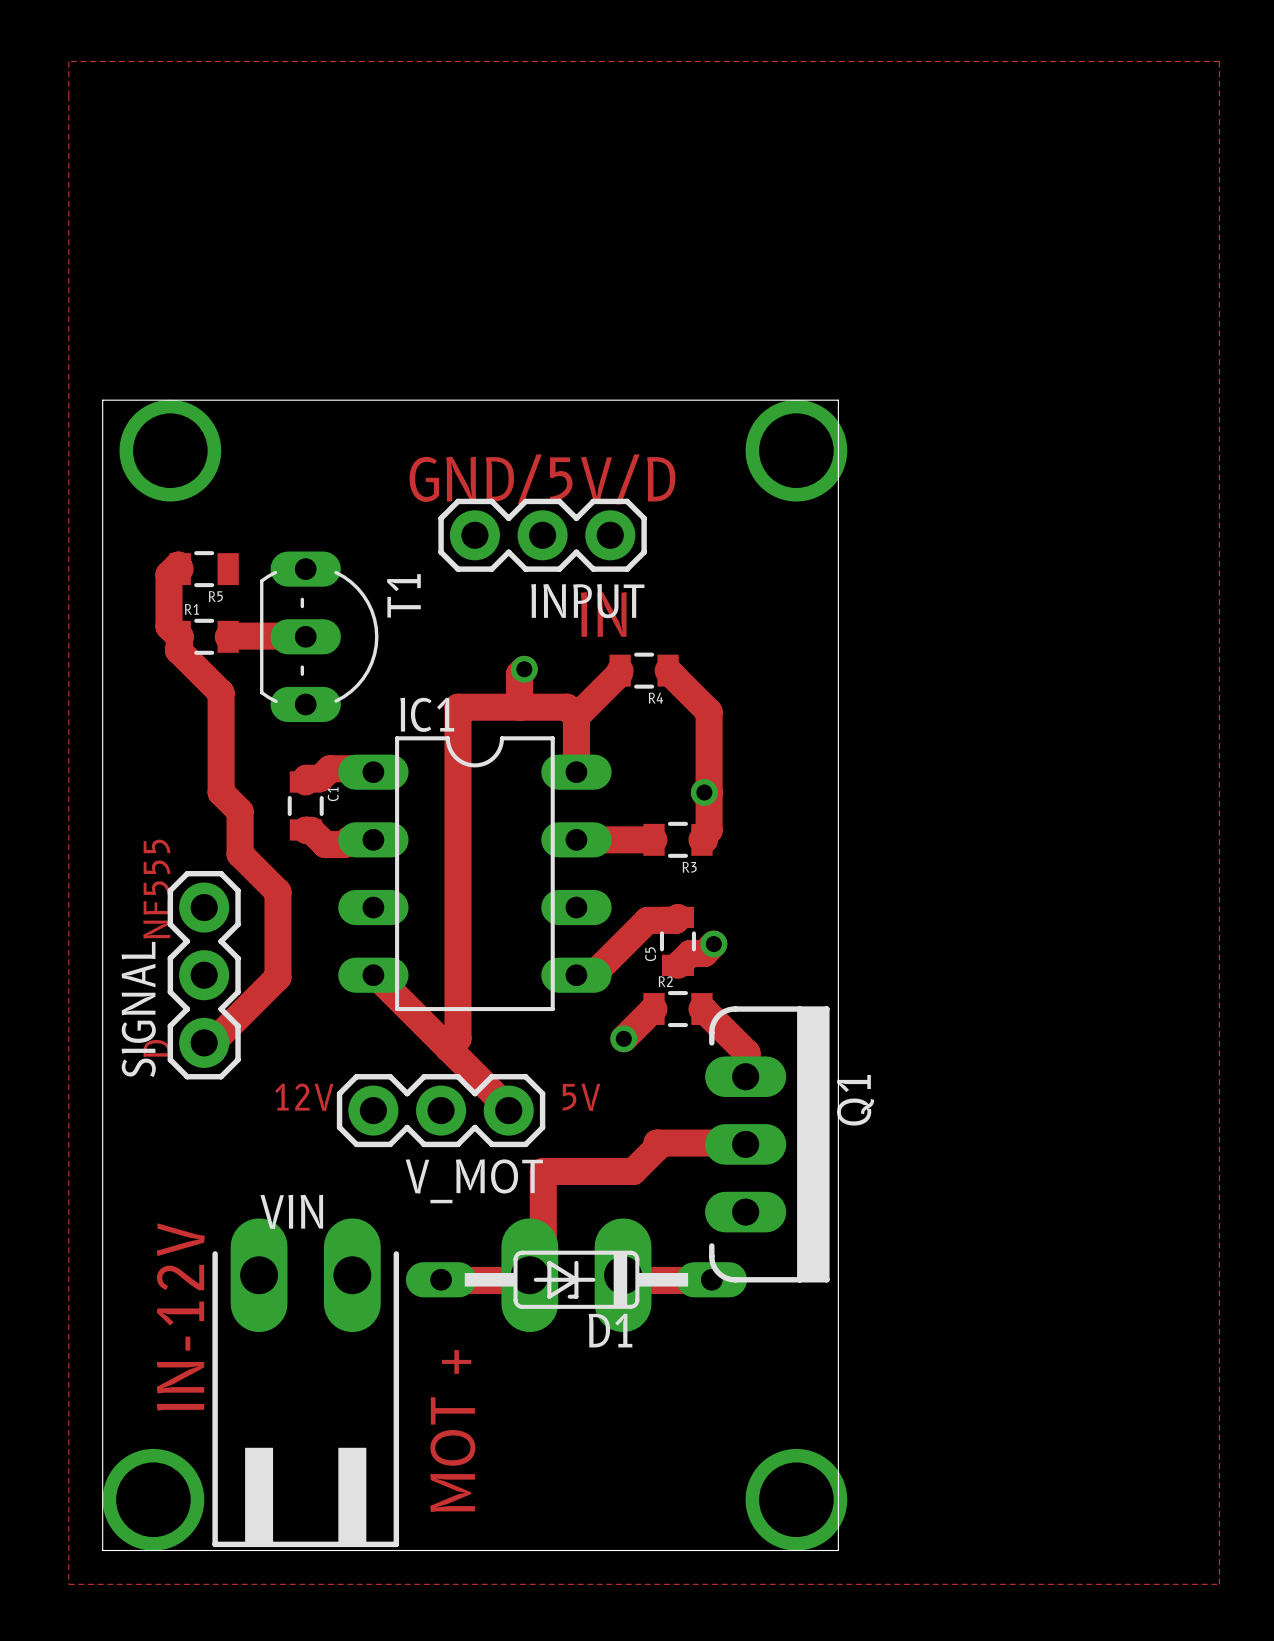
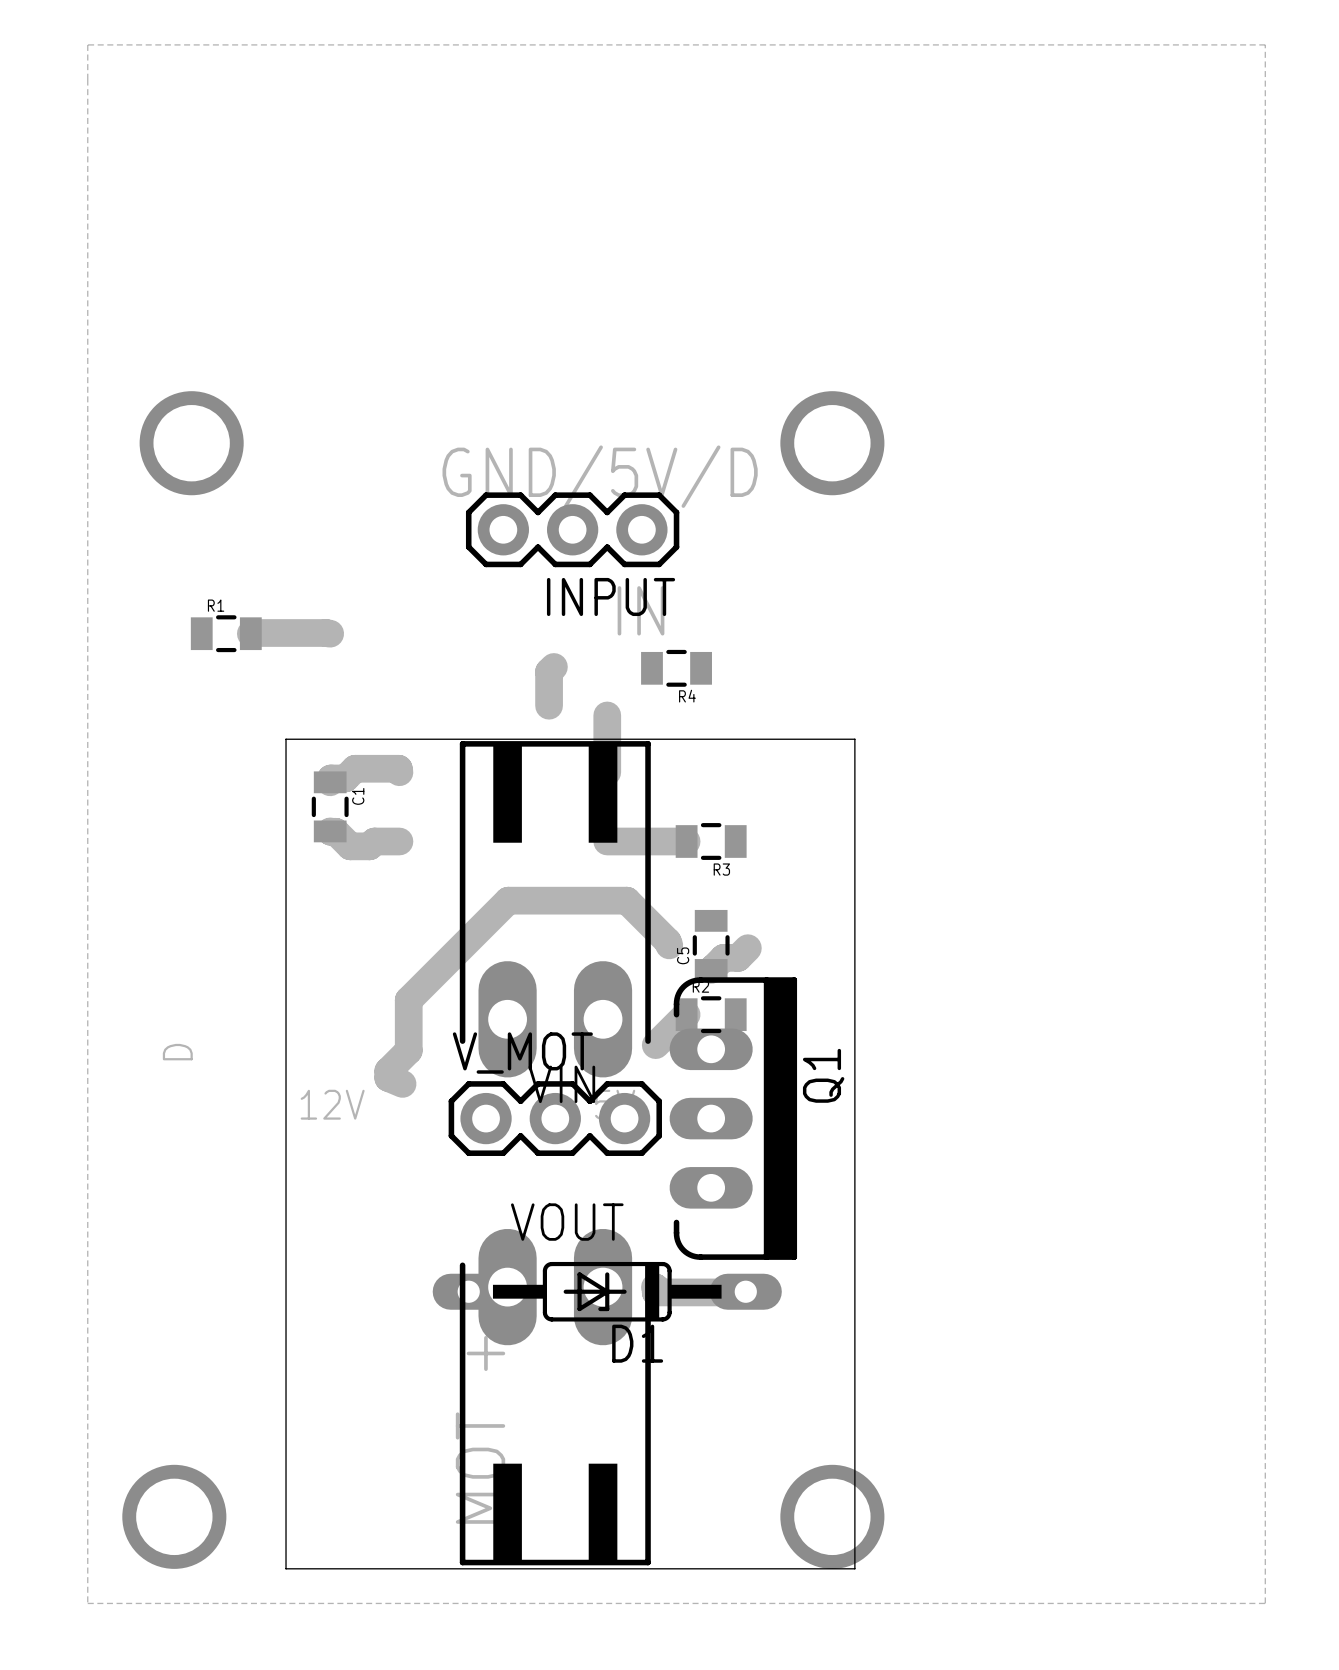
track: (180, 569) (178, 565) (169, 574) (169, 626) (180, 636) (178, 650) (221, 692) (221, 792) (240, 811) (240, 854) (277, 891) (277, 977) (216, 1038) (206, 1038) (204, 1042) -> none
R5: (204, 569) -> none
T1: (319, 636) -> none
via: (524, 669) -> none
track: (620, 670) (619, 674) (576, 716) (566, 707) (458, 707) (458, 1038) (448, 1048) -> none
track: (668, 670) (709, 711) (709, 830) (704, 835) (704, 839) (701, 839) -> none
via: (704, 792) -> none
IC1: (474, 873) -> none
text: NE555 (156, 889) -> none
track: (677, 917) (675, 920) (647, 920) (595, 972) (576, 972) (576, 975) -> none
track: none -> (669, 945) (667, 941) (626, 900) (508, 900) (408, 1000) (408, 1050) (388, 1071) (388, 1077) (402, 1083)
via: (713, 944) -> none
SIGNAL: (204, 975) -> none
track: (373, 975) (505, 1105) (505, 1109) (508, 1110) -> none
track: (701, 1009) (747, 1053) (745, 1076) -> none
via: (623, 1038) -> none
V_MOT position: (441, 1110) -> (555, 1118)
track: (745, 1144) (656, 1143) (656, 1147) (633, 1171) (543, 1171) (543, 1275) (529, 1275) (529, 1280) (441, 1279) -> none
Q1 position: (767, 1144) -> (733, 1118)
V_MOT name position: V_MOT (474, 1181) -> V_MOT (522, 1053)
VOUT side: bottom (576, 1275) -> top (555, 1397)
text: IN-12V (180, 1316) -> none
VIN rotation: 0° (305, 1382) -> 180° (555, 909)
VIN position: (305, 1382) -> (555, 909)
board edge: (262, 1550) (102, 1550) (102, 400) (838, 400) (838, 1550) (818, 1550) -> (286, 1568) (286, 739) (854, 739) (854, 1568)

